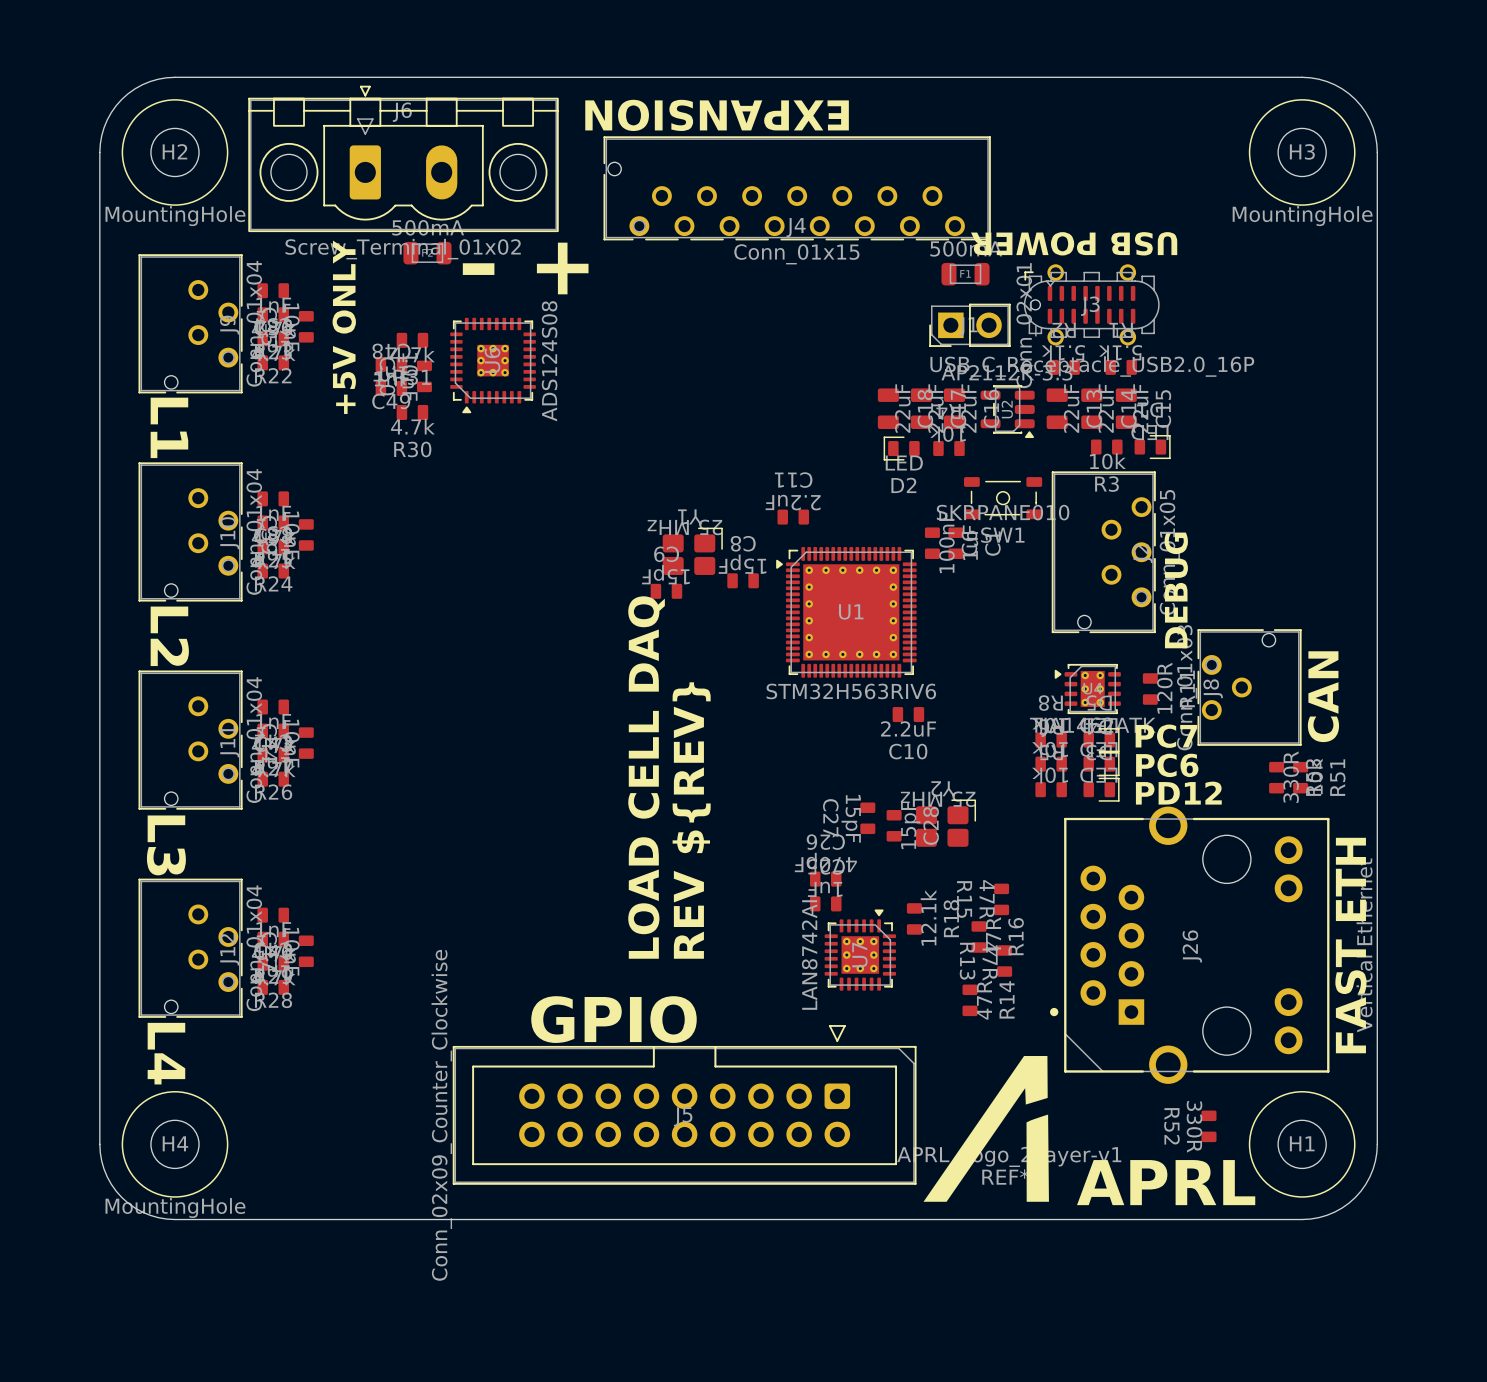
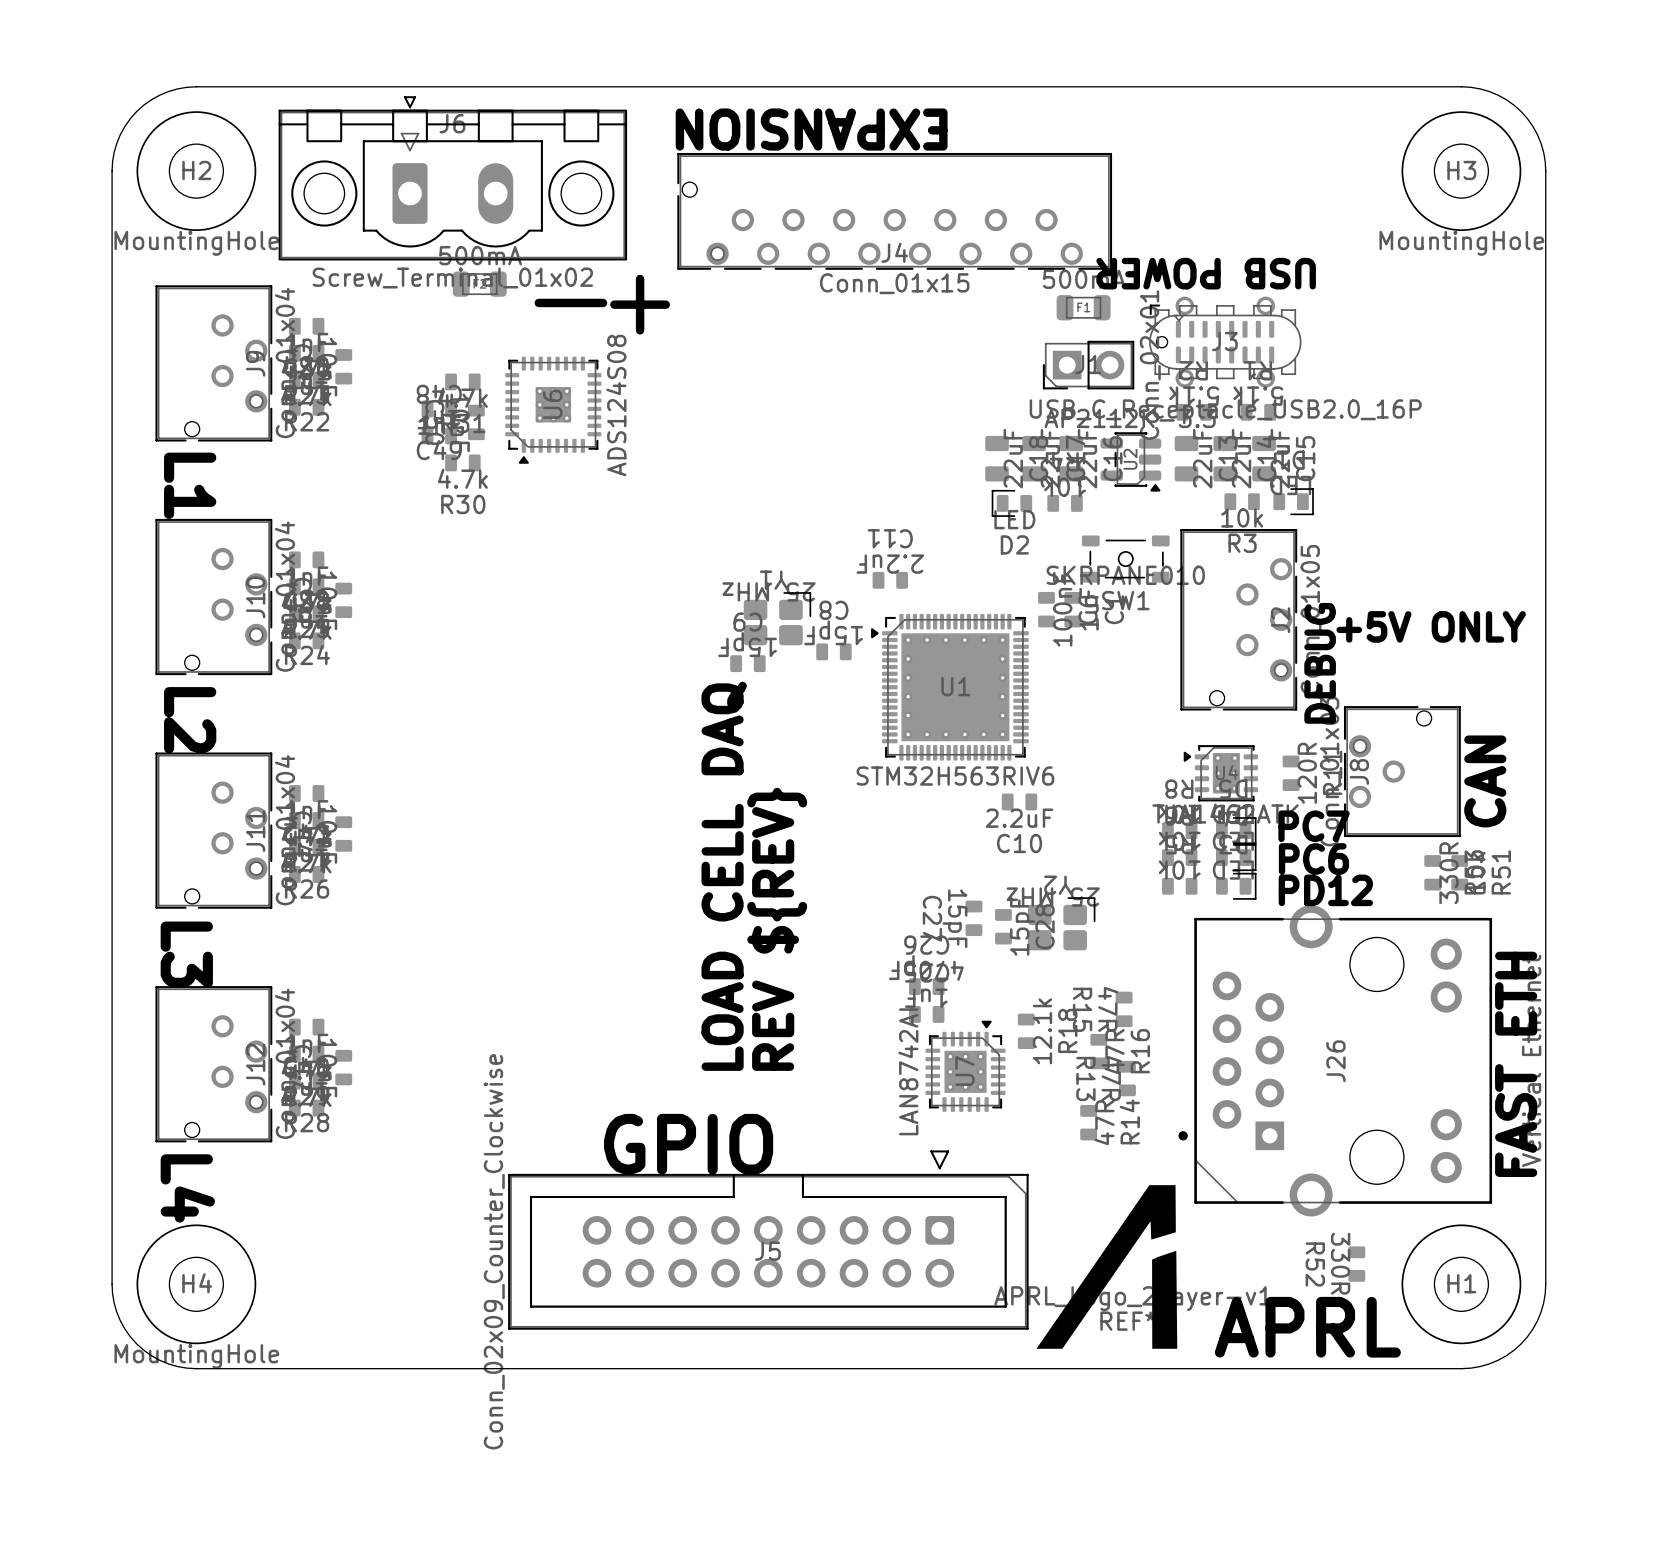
text: +5V ONLY (344, 327) -> none
text: none -> +5V ONLY (1431, 626)

